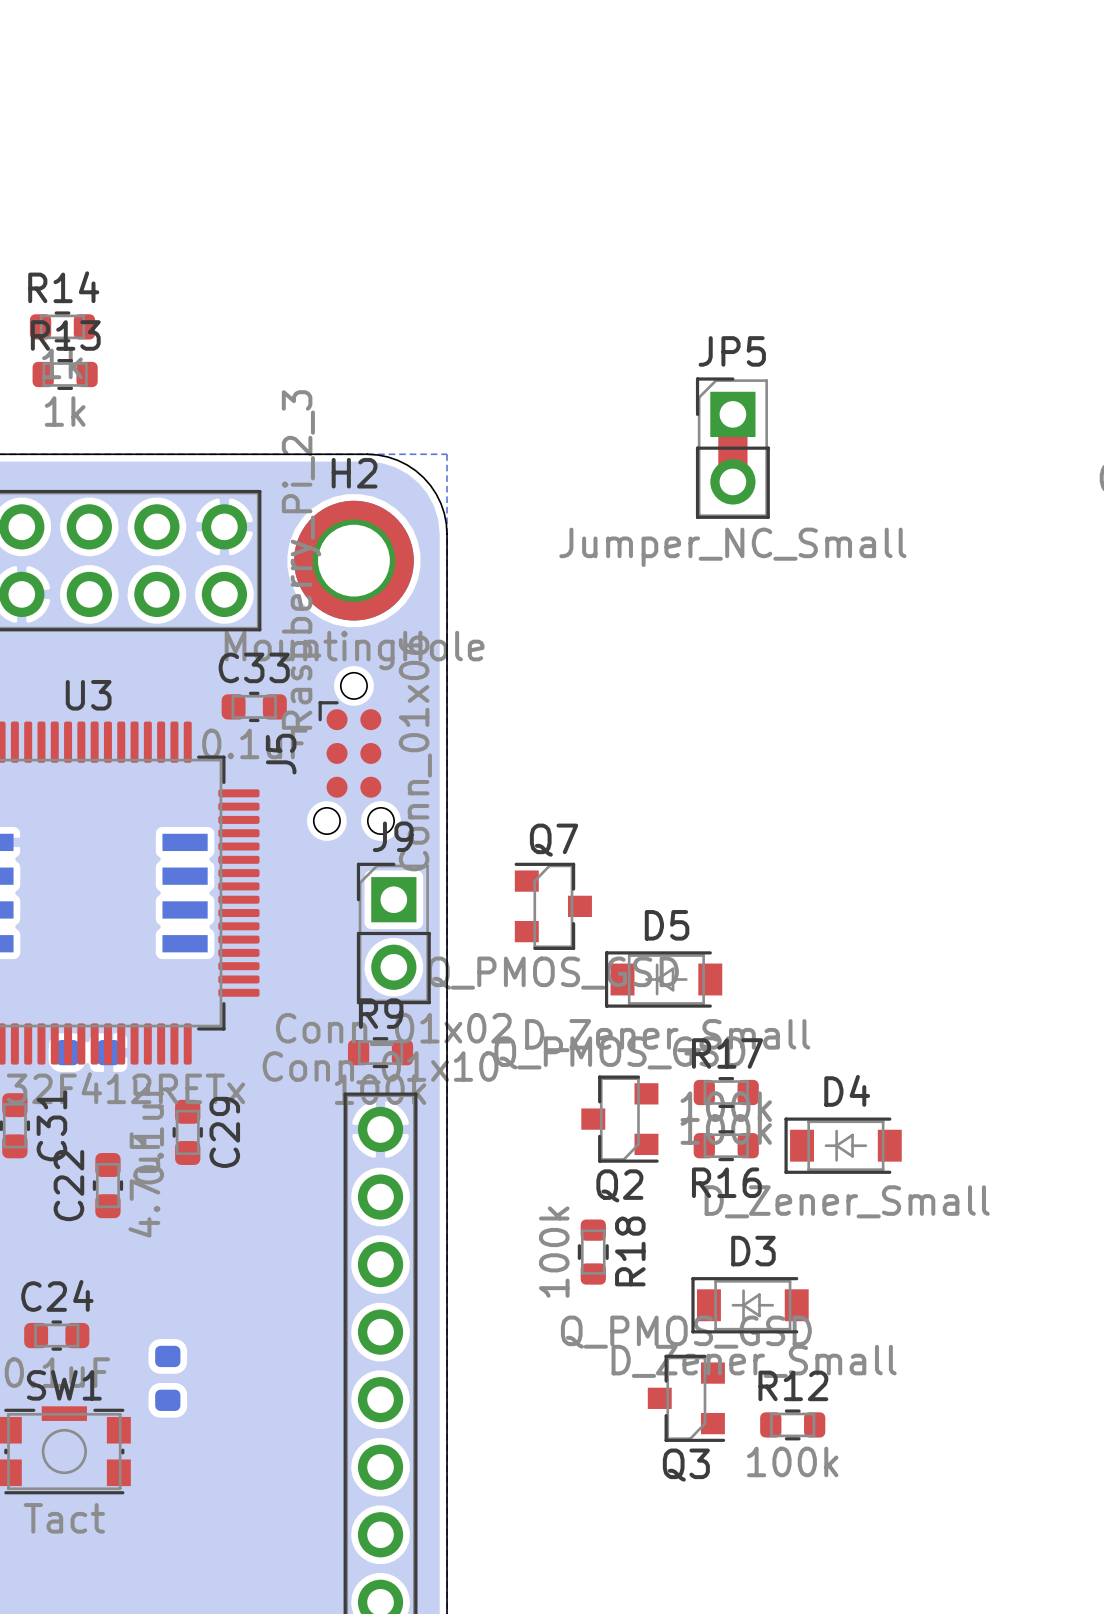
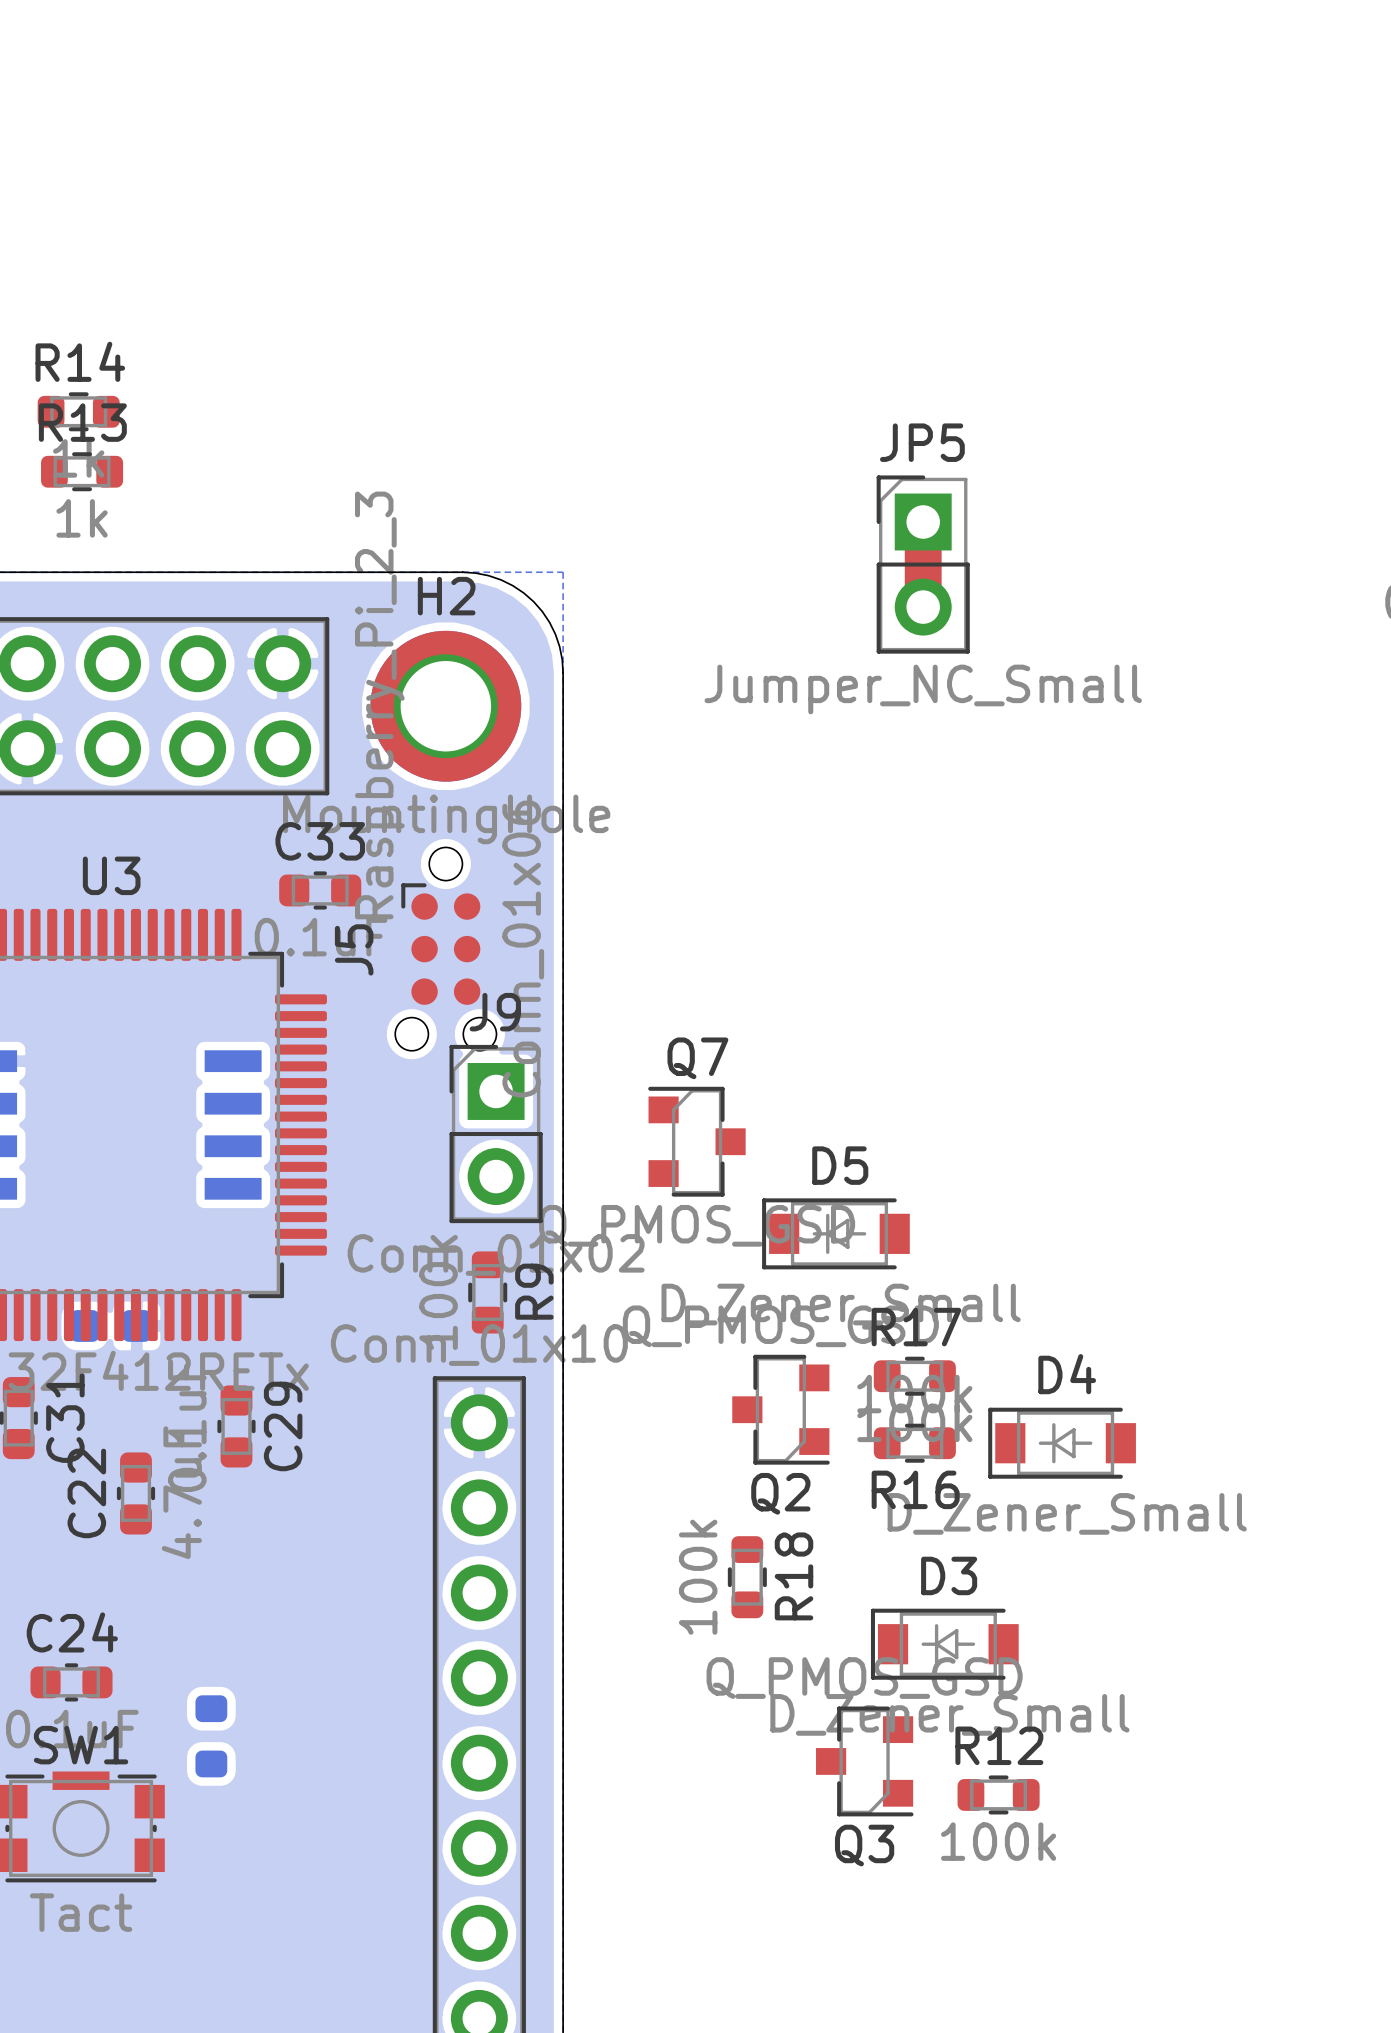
J9 position: (393, 933) -> (496, 1134)
R9 rotation: 0° (380, 1052) -> 90° clockwise (487, 1292)

